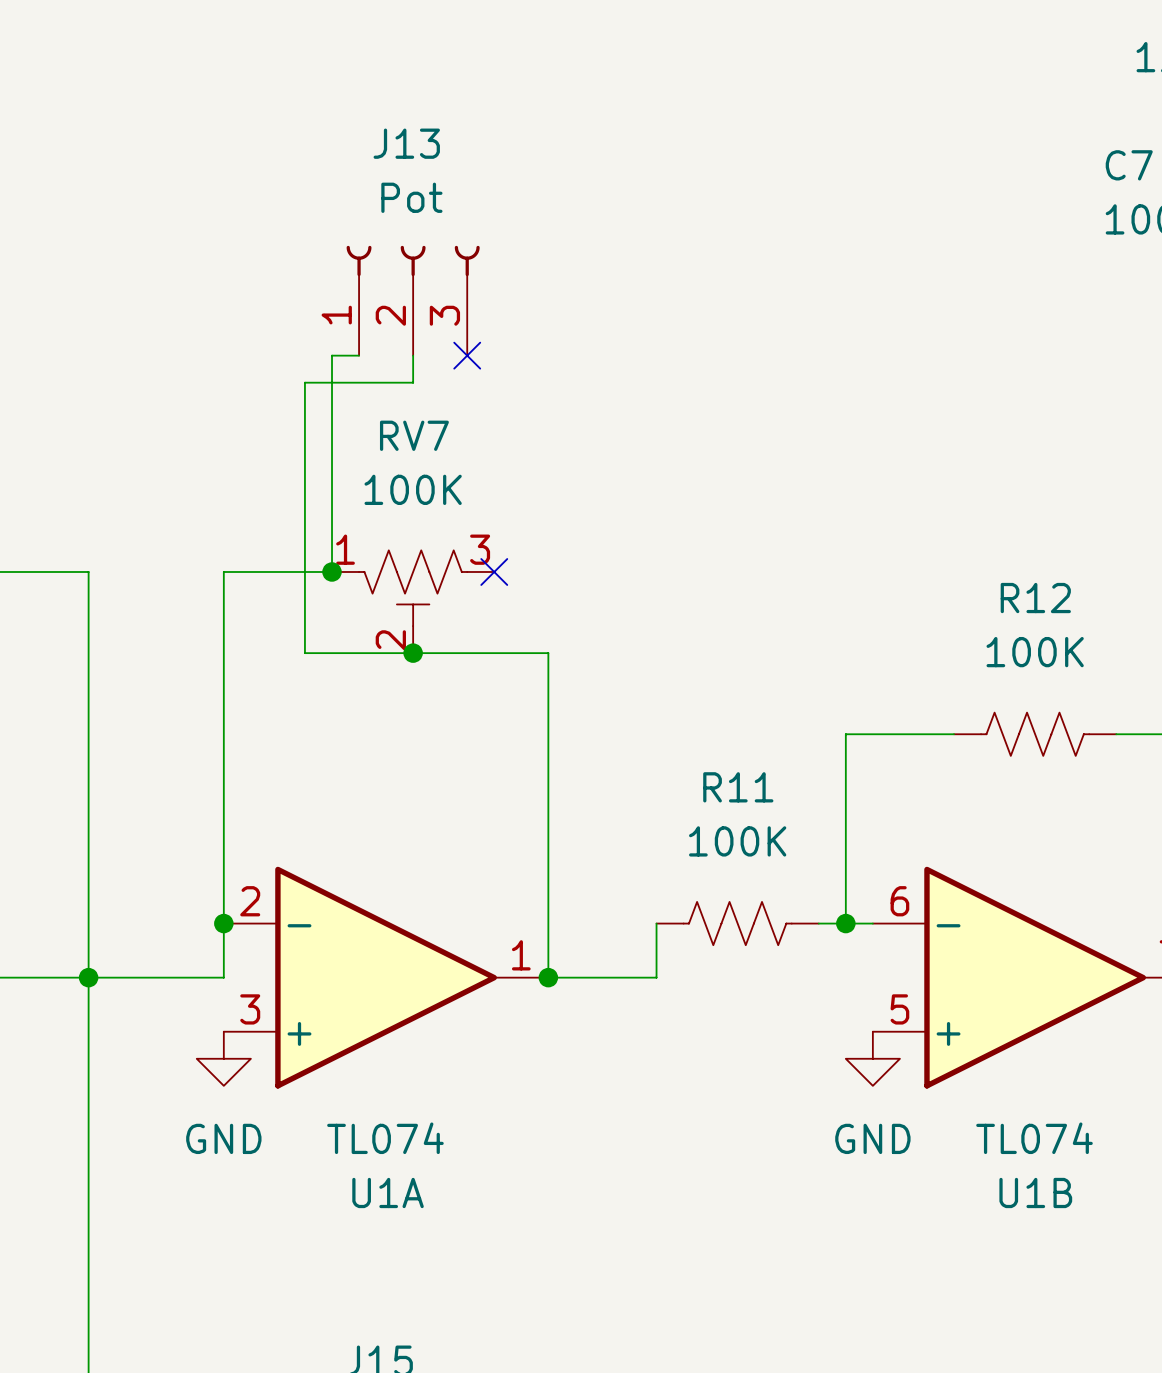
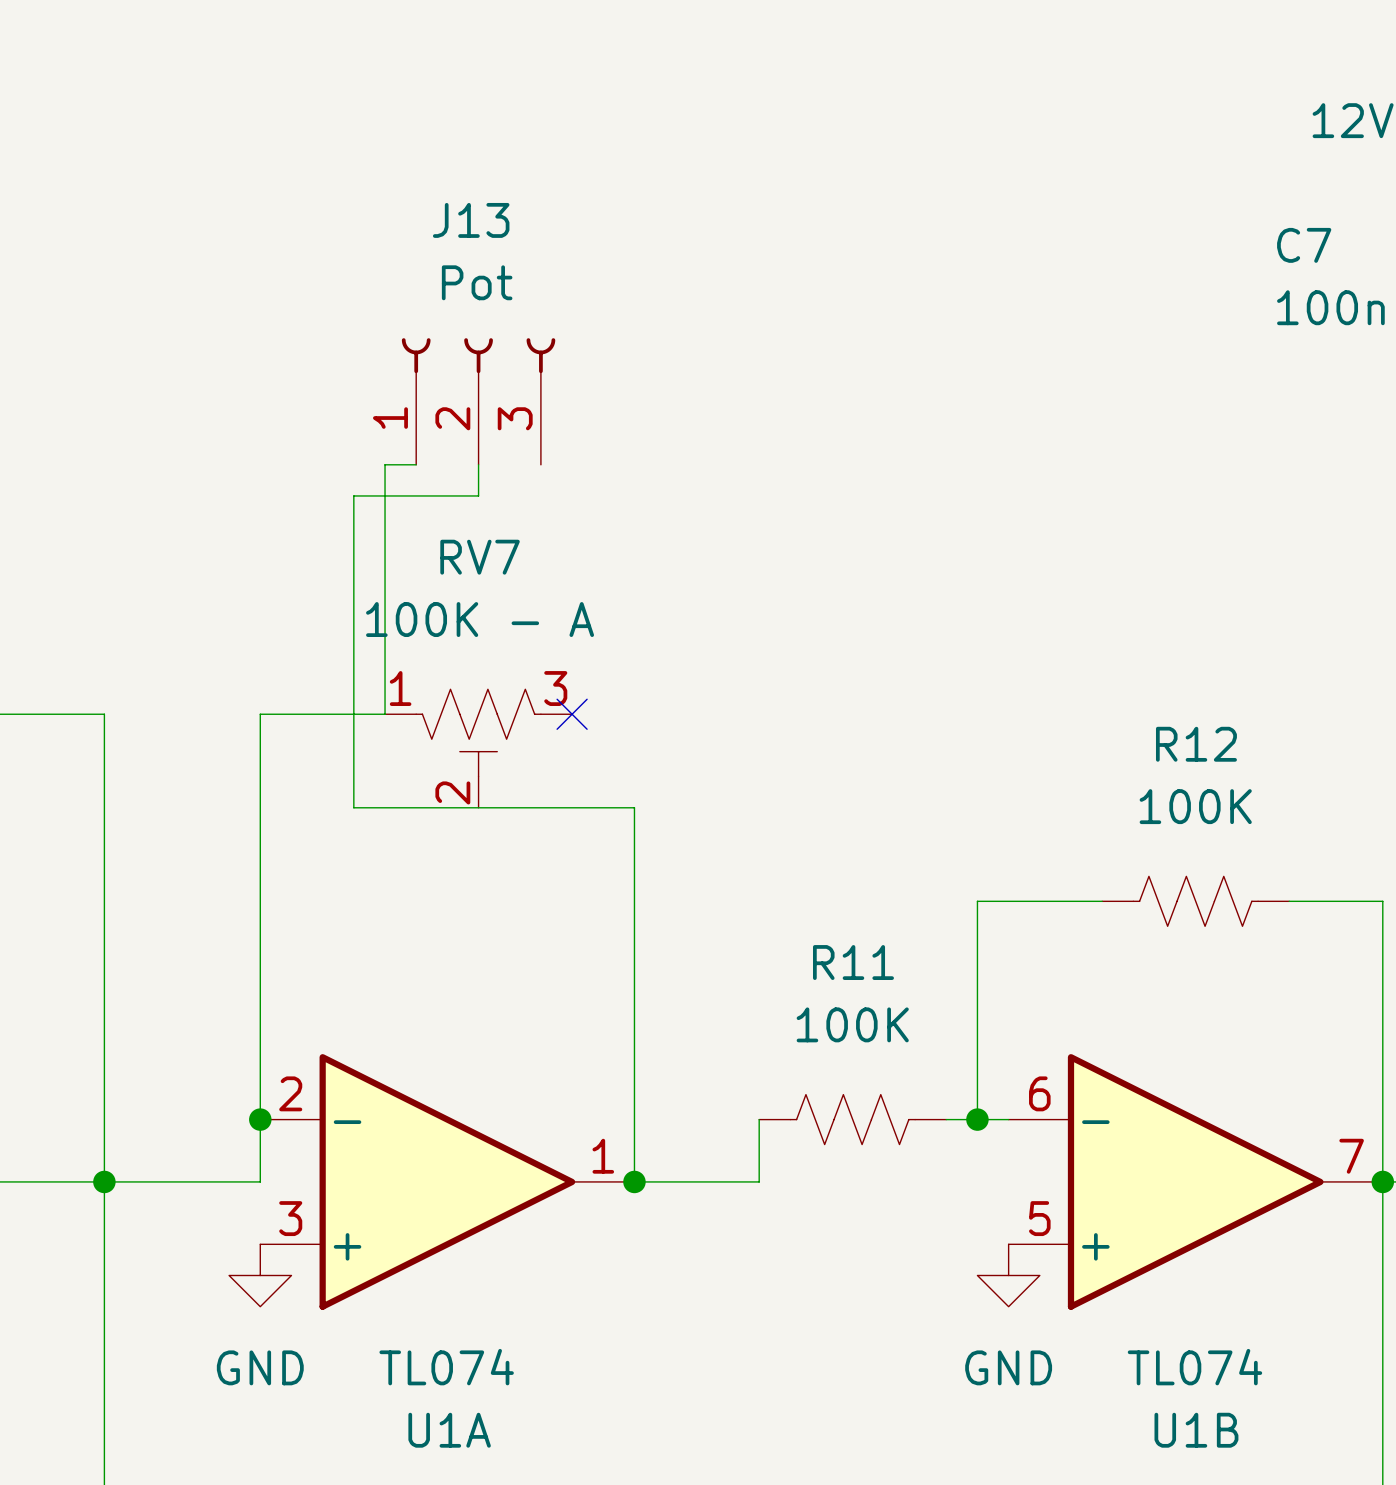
no-connect mark: (467, 355) -> none
RV7 value: 100K (413, 489) -> 100K - A (480, 619)
junction: (332, 571) -> none
junction: (413, 653) -> none

